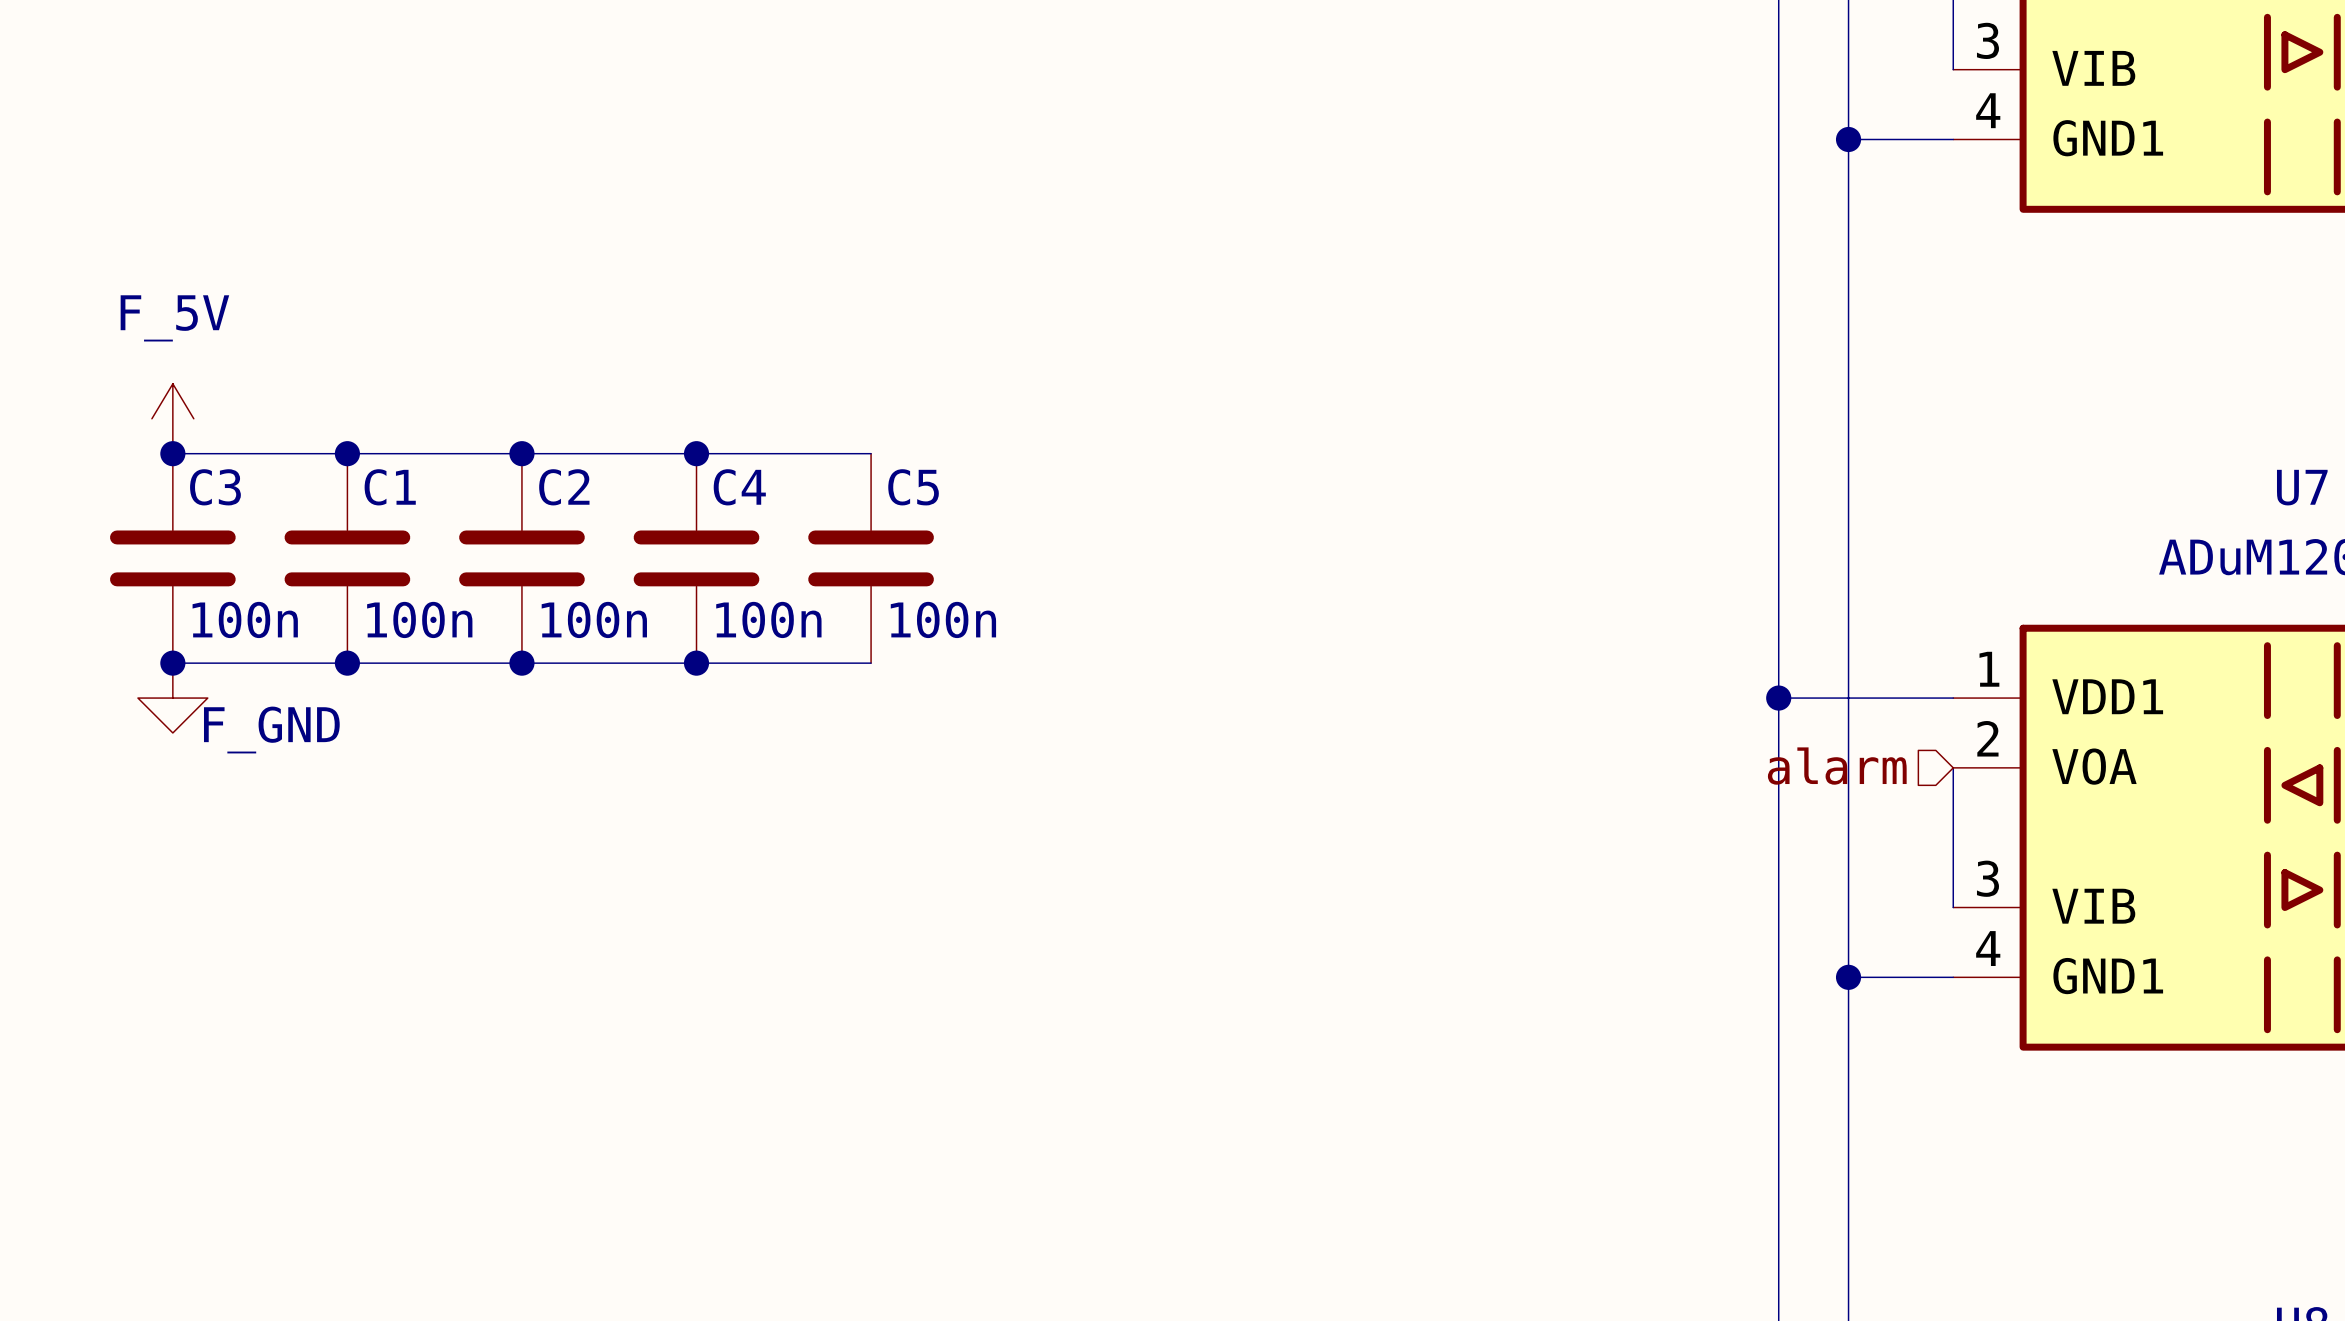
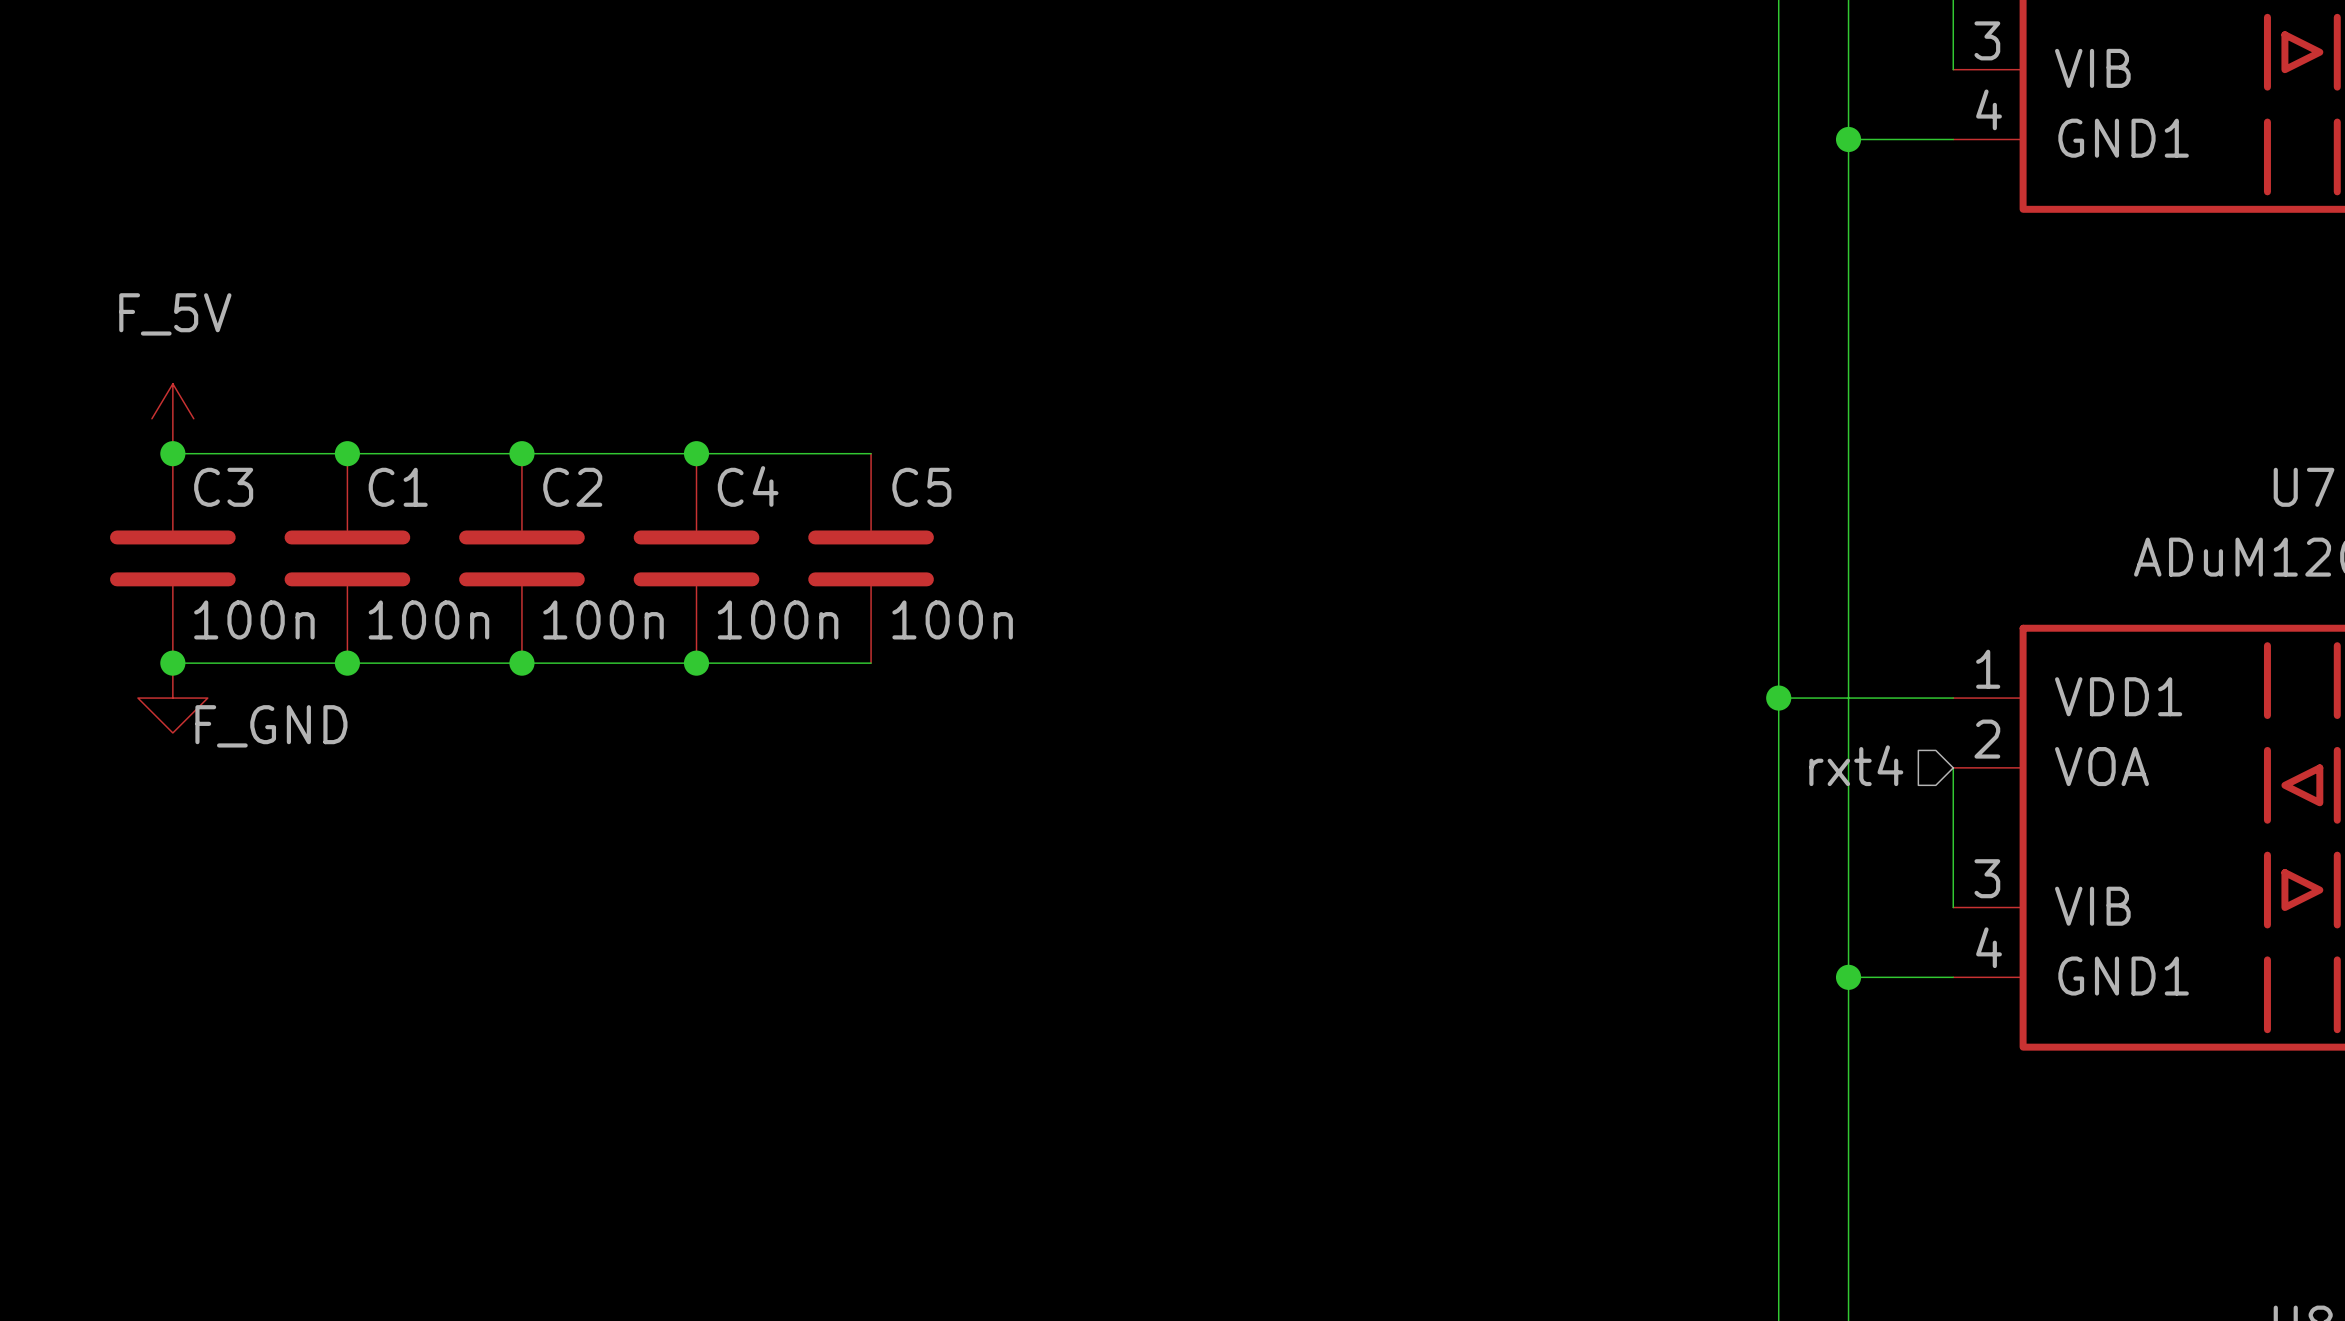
hierarchical label: alarm (1837, 766) -> rxt4 (1856, 765)

